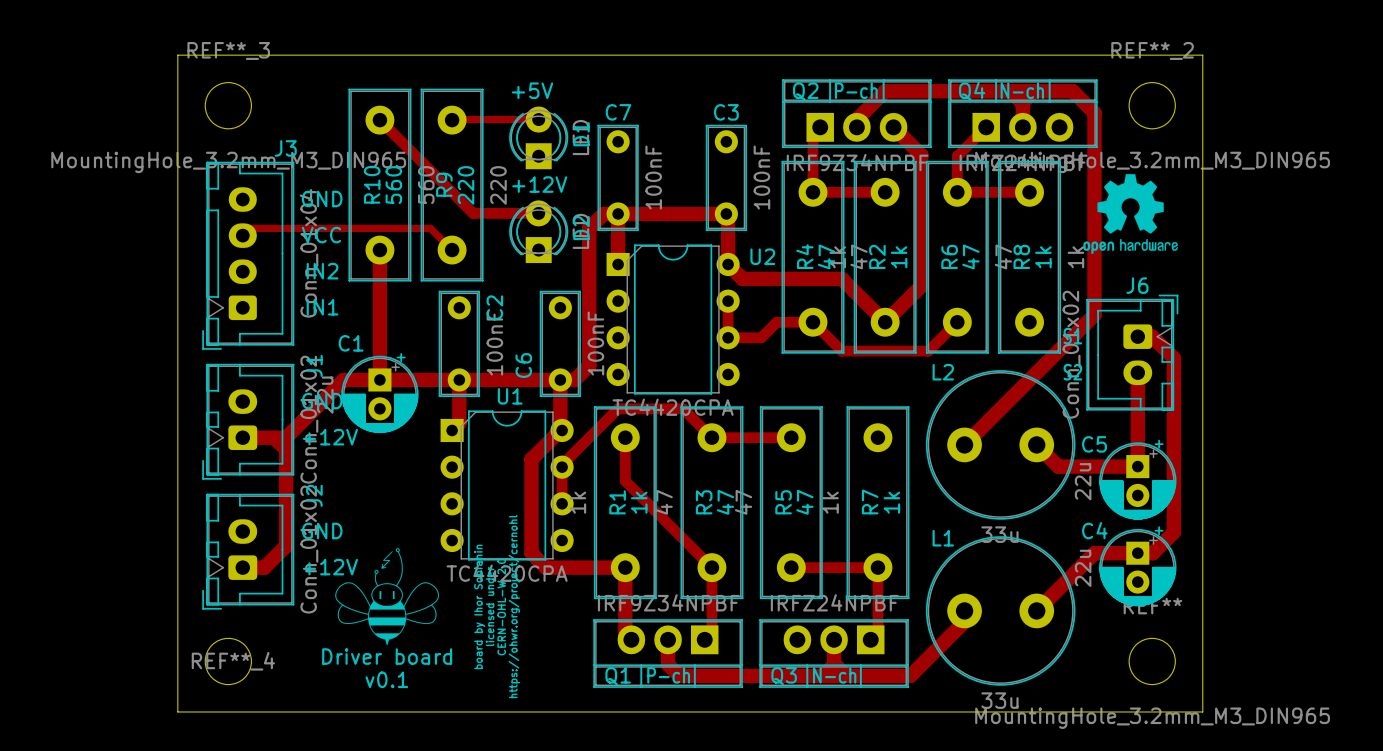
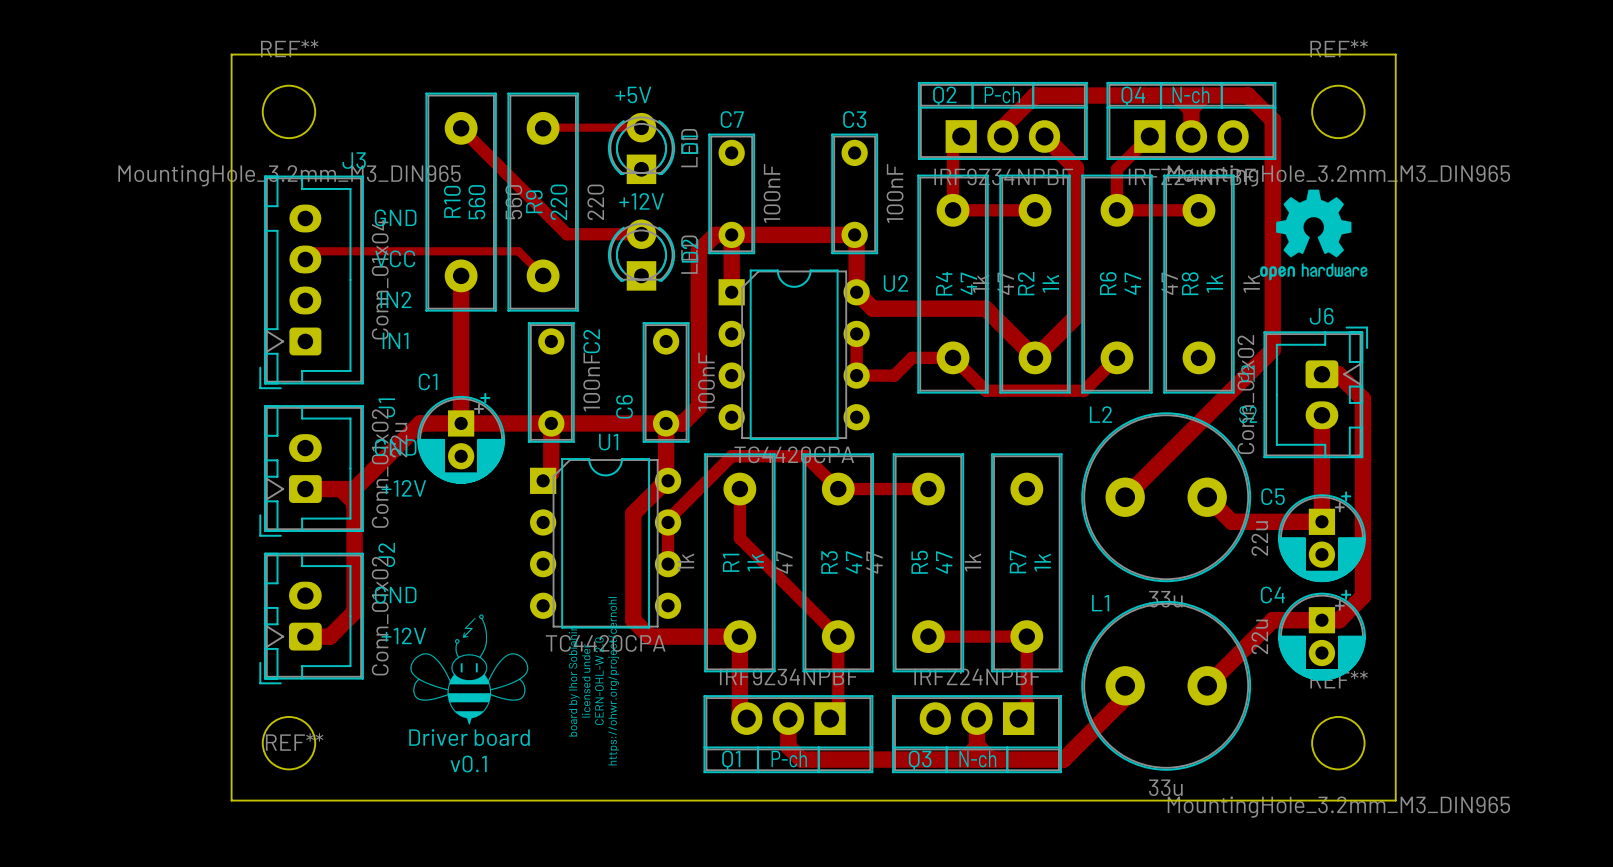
REF**_3 name: REF**_3 (228, 50) -> REF** (289, 48)
REF**_2 name: REF**_2 (1152, 50) -> REF** (1339, 48)
REF**_4 name: REF**_4 (233, 661) -> REF** (294, 742)

